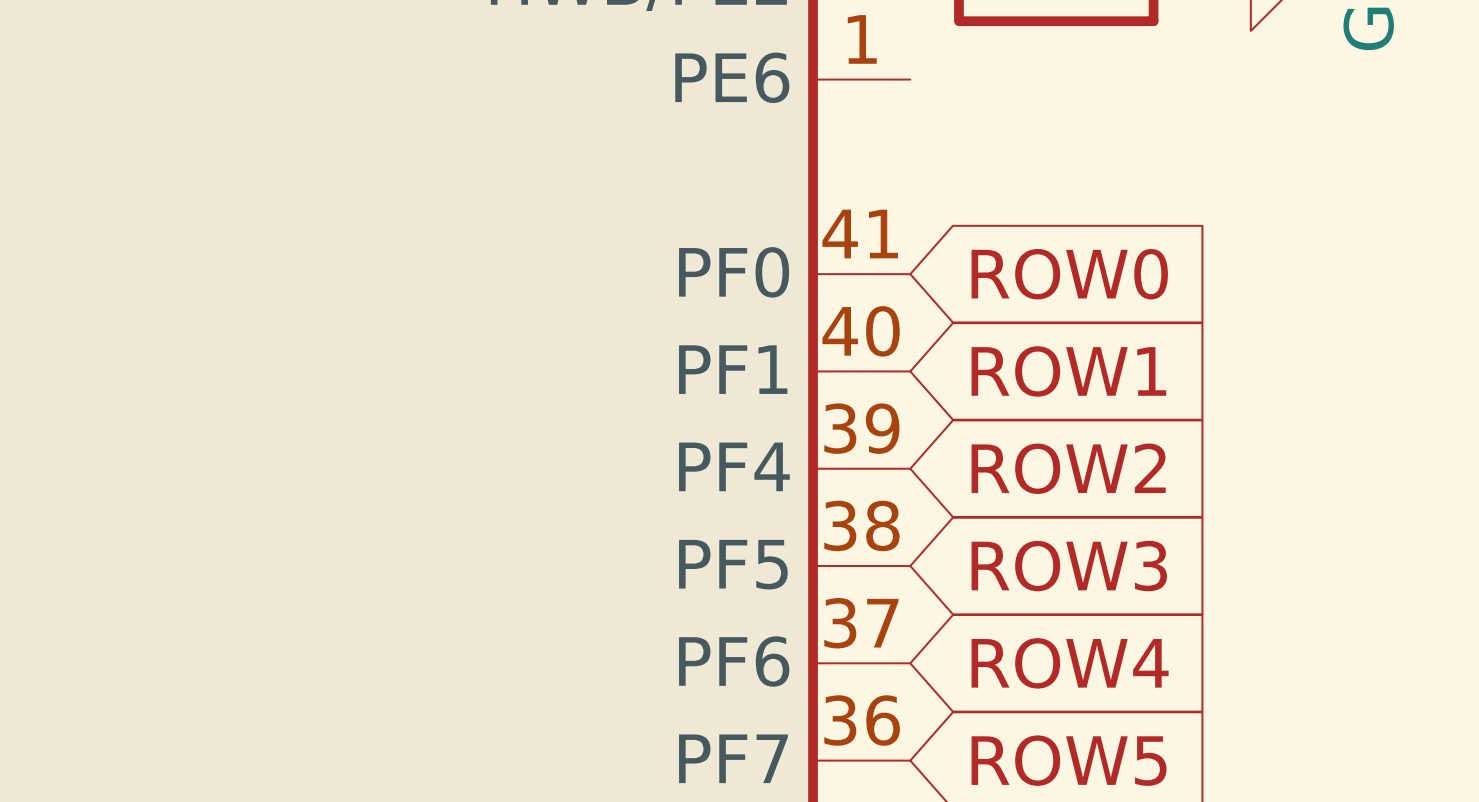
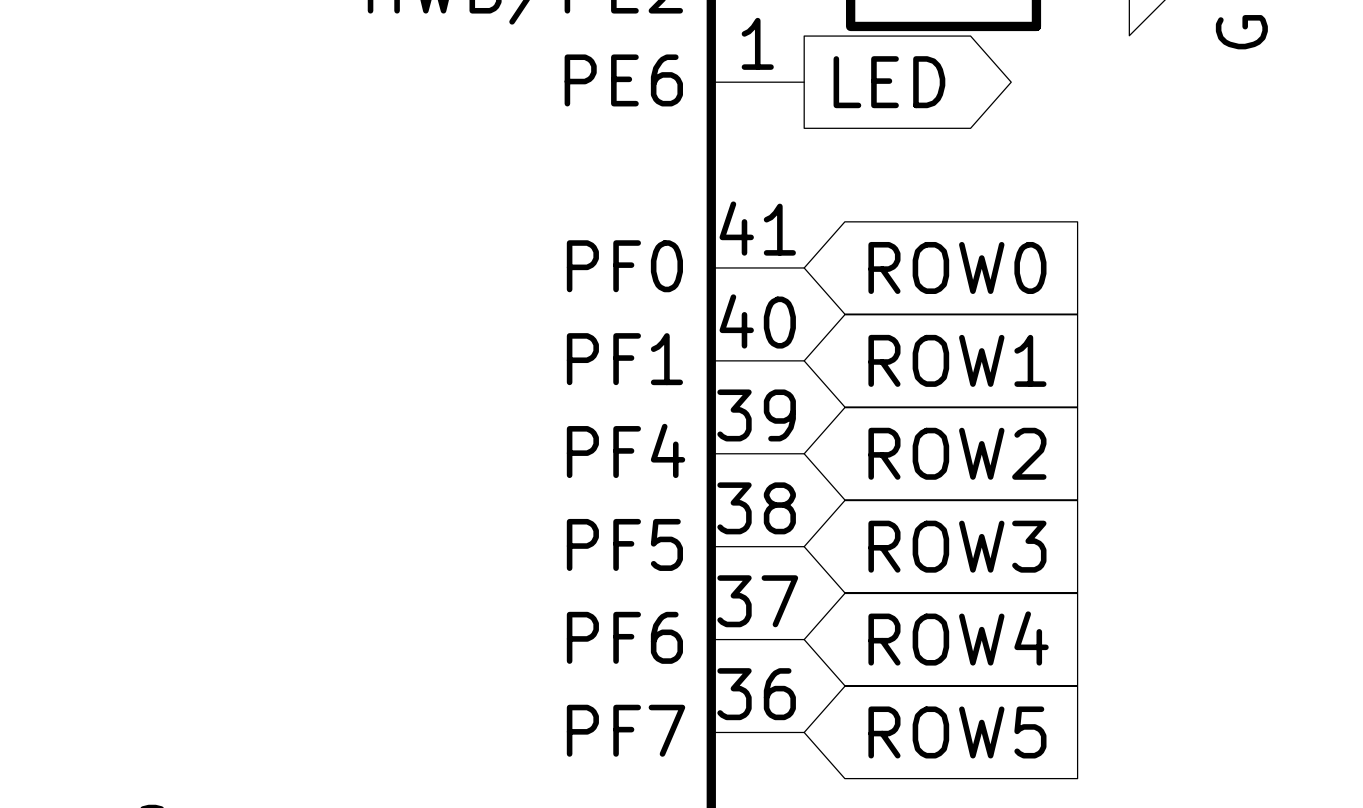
global label: none -> LED (889, 82)

